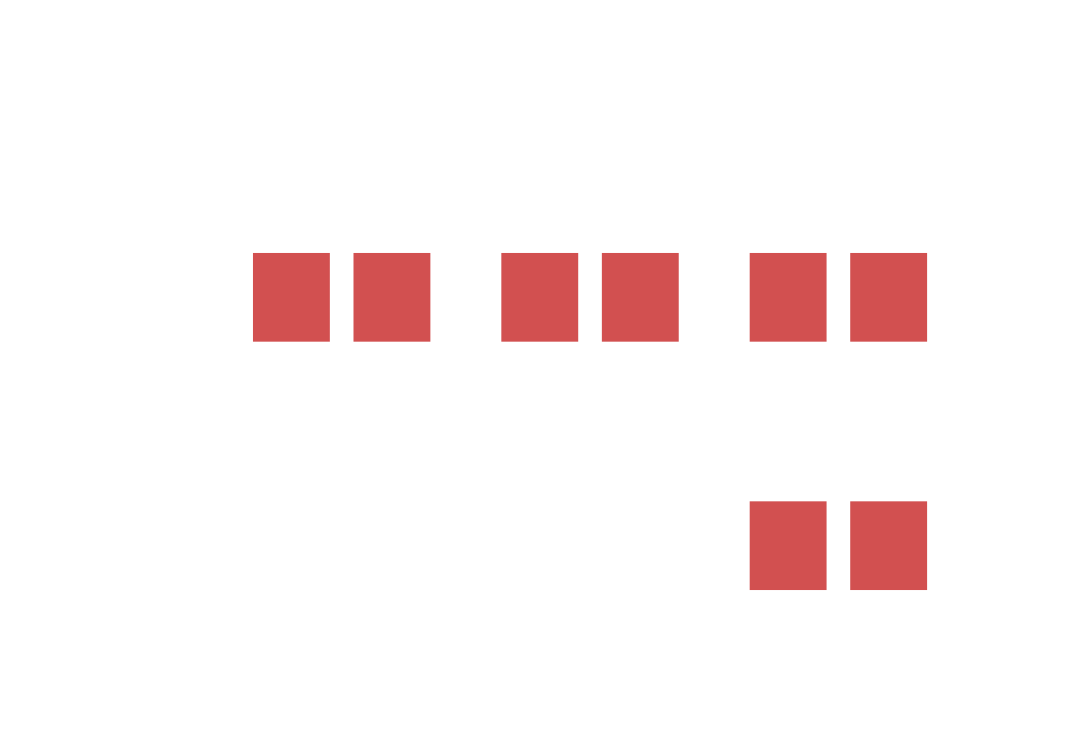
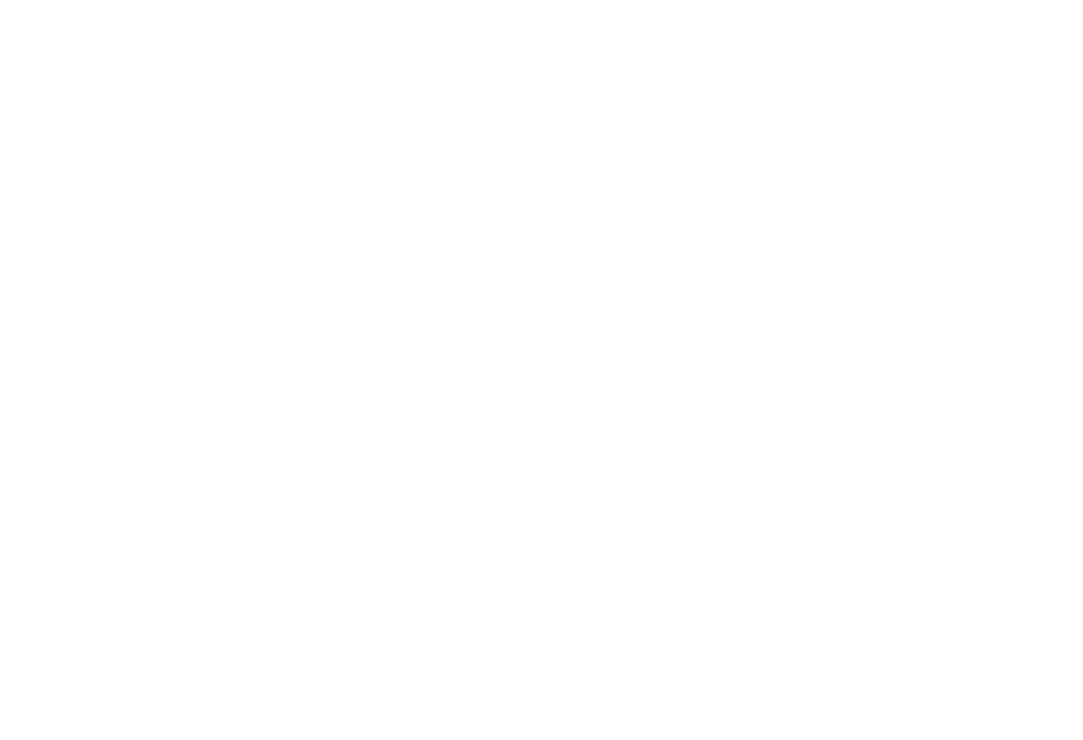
part: (341, 297) -> none
part: (590, 297) -> none
part: (838, 297) -> none
part: (838, 545) -> none

